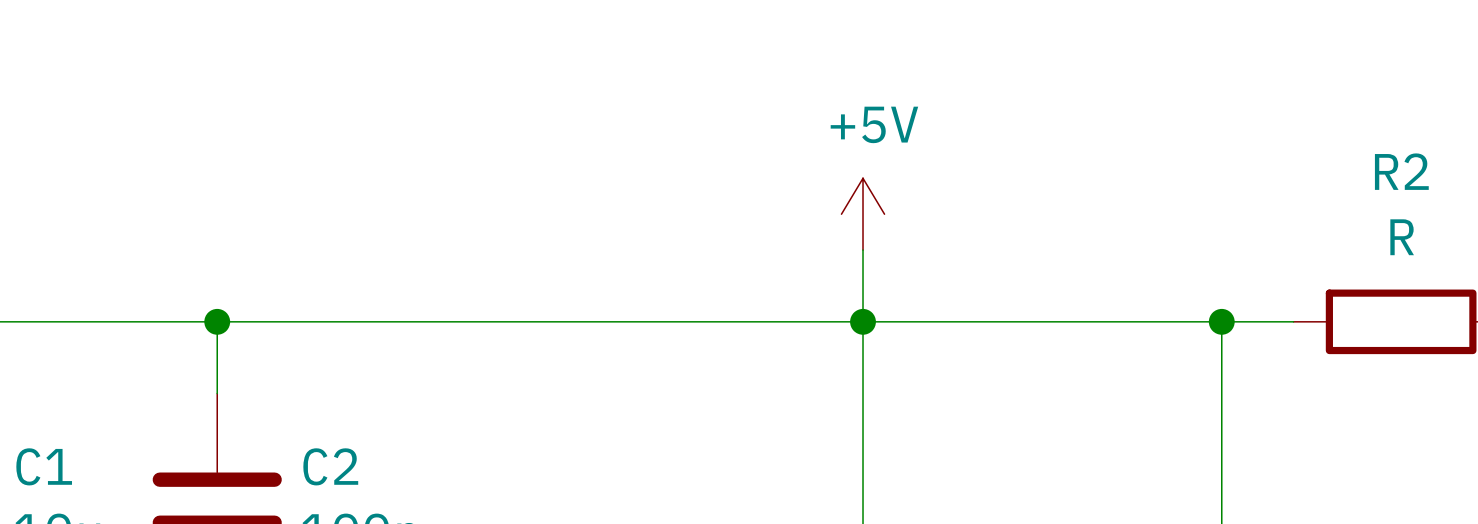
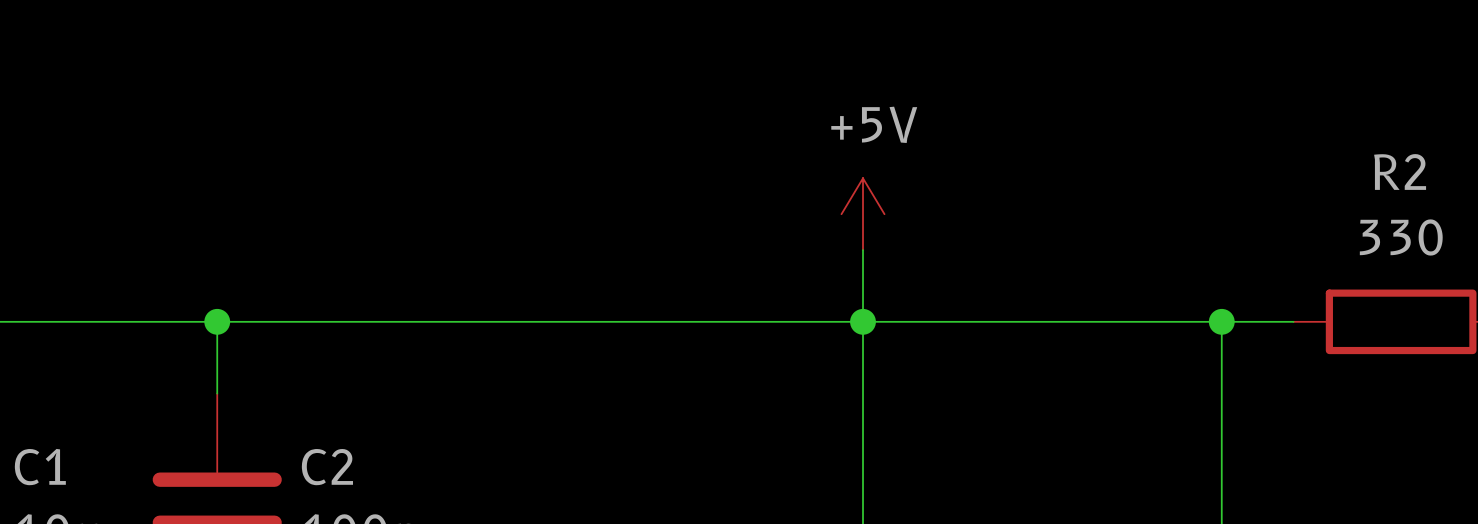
R2 value: R (1402, 237) -> 330 (1401, 237)

